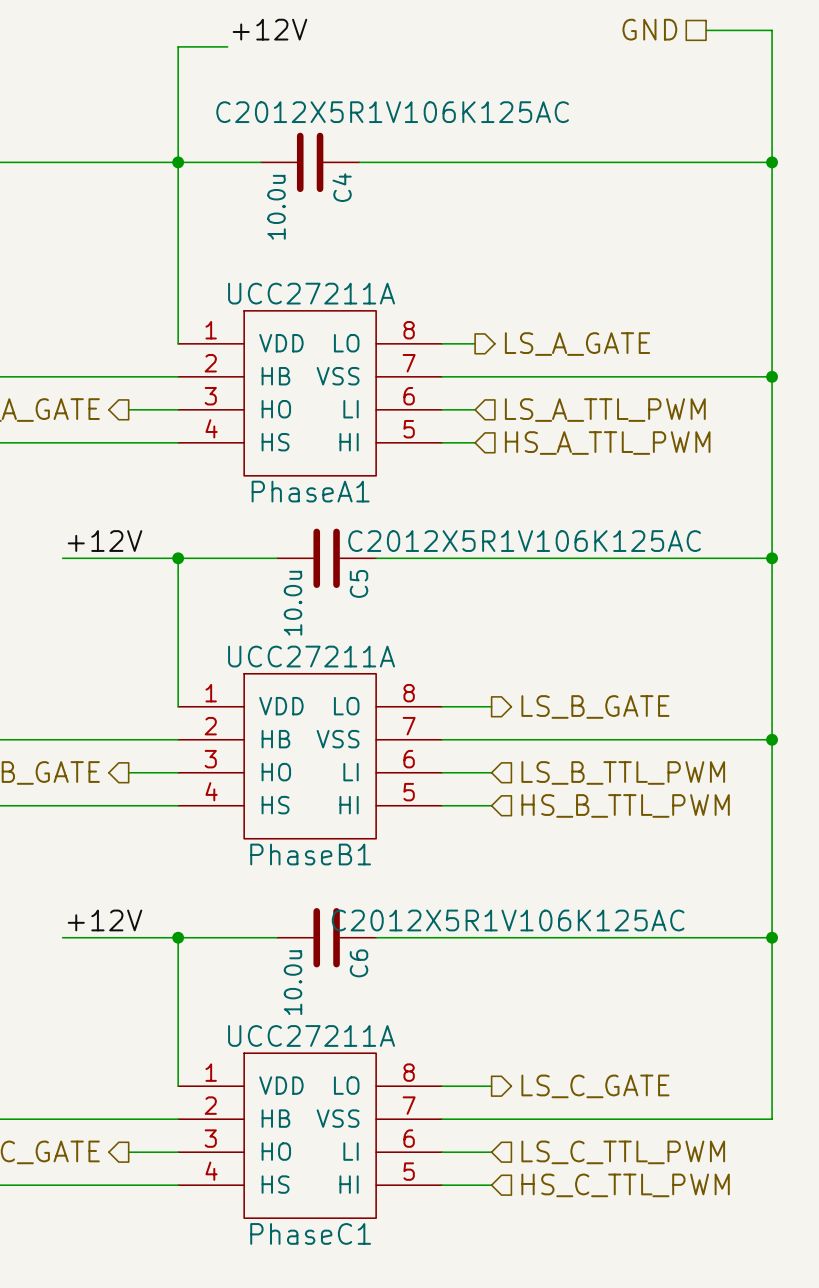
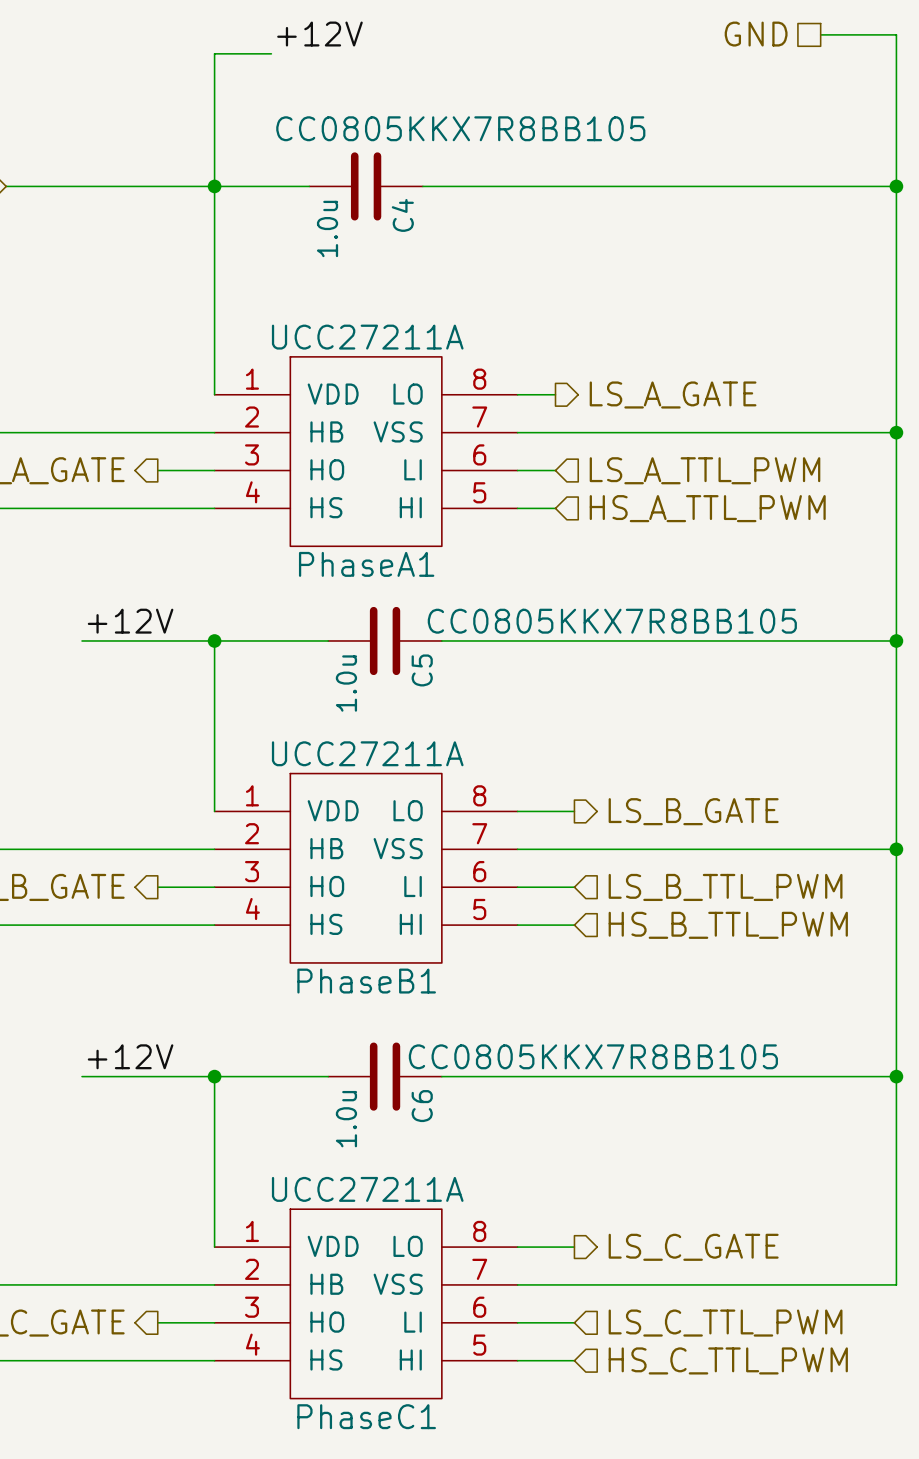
C4 text: C2012X5R1V106K125AC (392, 112) -> CC0805KKX7R8BB105 (460, 128)
C4 value: 10.0u (276, 207) -> 1.0u (327, 228)
C5 text: C2012X5R1V106K125AC (524, 541) -> CC0805KKX7R8BB105 (612, 621)
C5 value: 10.0u (293, 603) -> 1.0u (346, 683)
C6 text: C2012X5R1V106K125AC (508, 920) -> CC0805KKX7R8BB105 (593, 1056)
C6 value: 10.0u (293, 982) -> 1.0u (346, 1119)

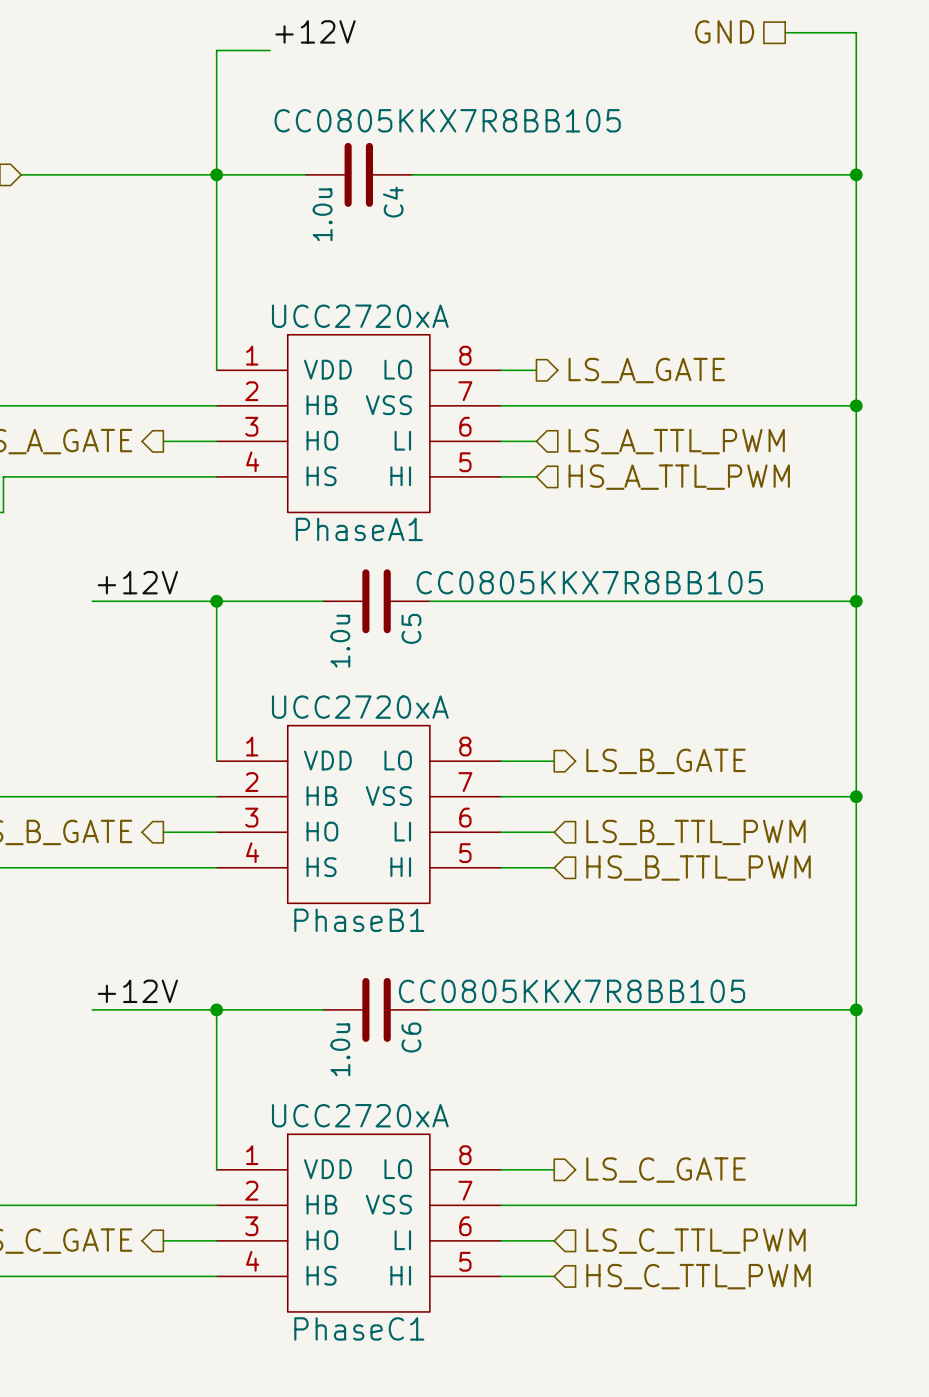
PhaseA1 value: UCC27211A (367, 337) -> UCC2720xA (360, 316)
PhaseB1 value: UCC27211A (367, 753) -> UCC2720xA (360, 707)
PhaseC1 value: UCC27211A (367, 1189) -> UCC2720xA (360, 1115)

